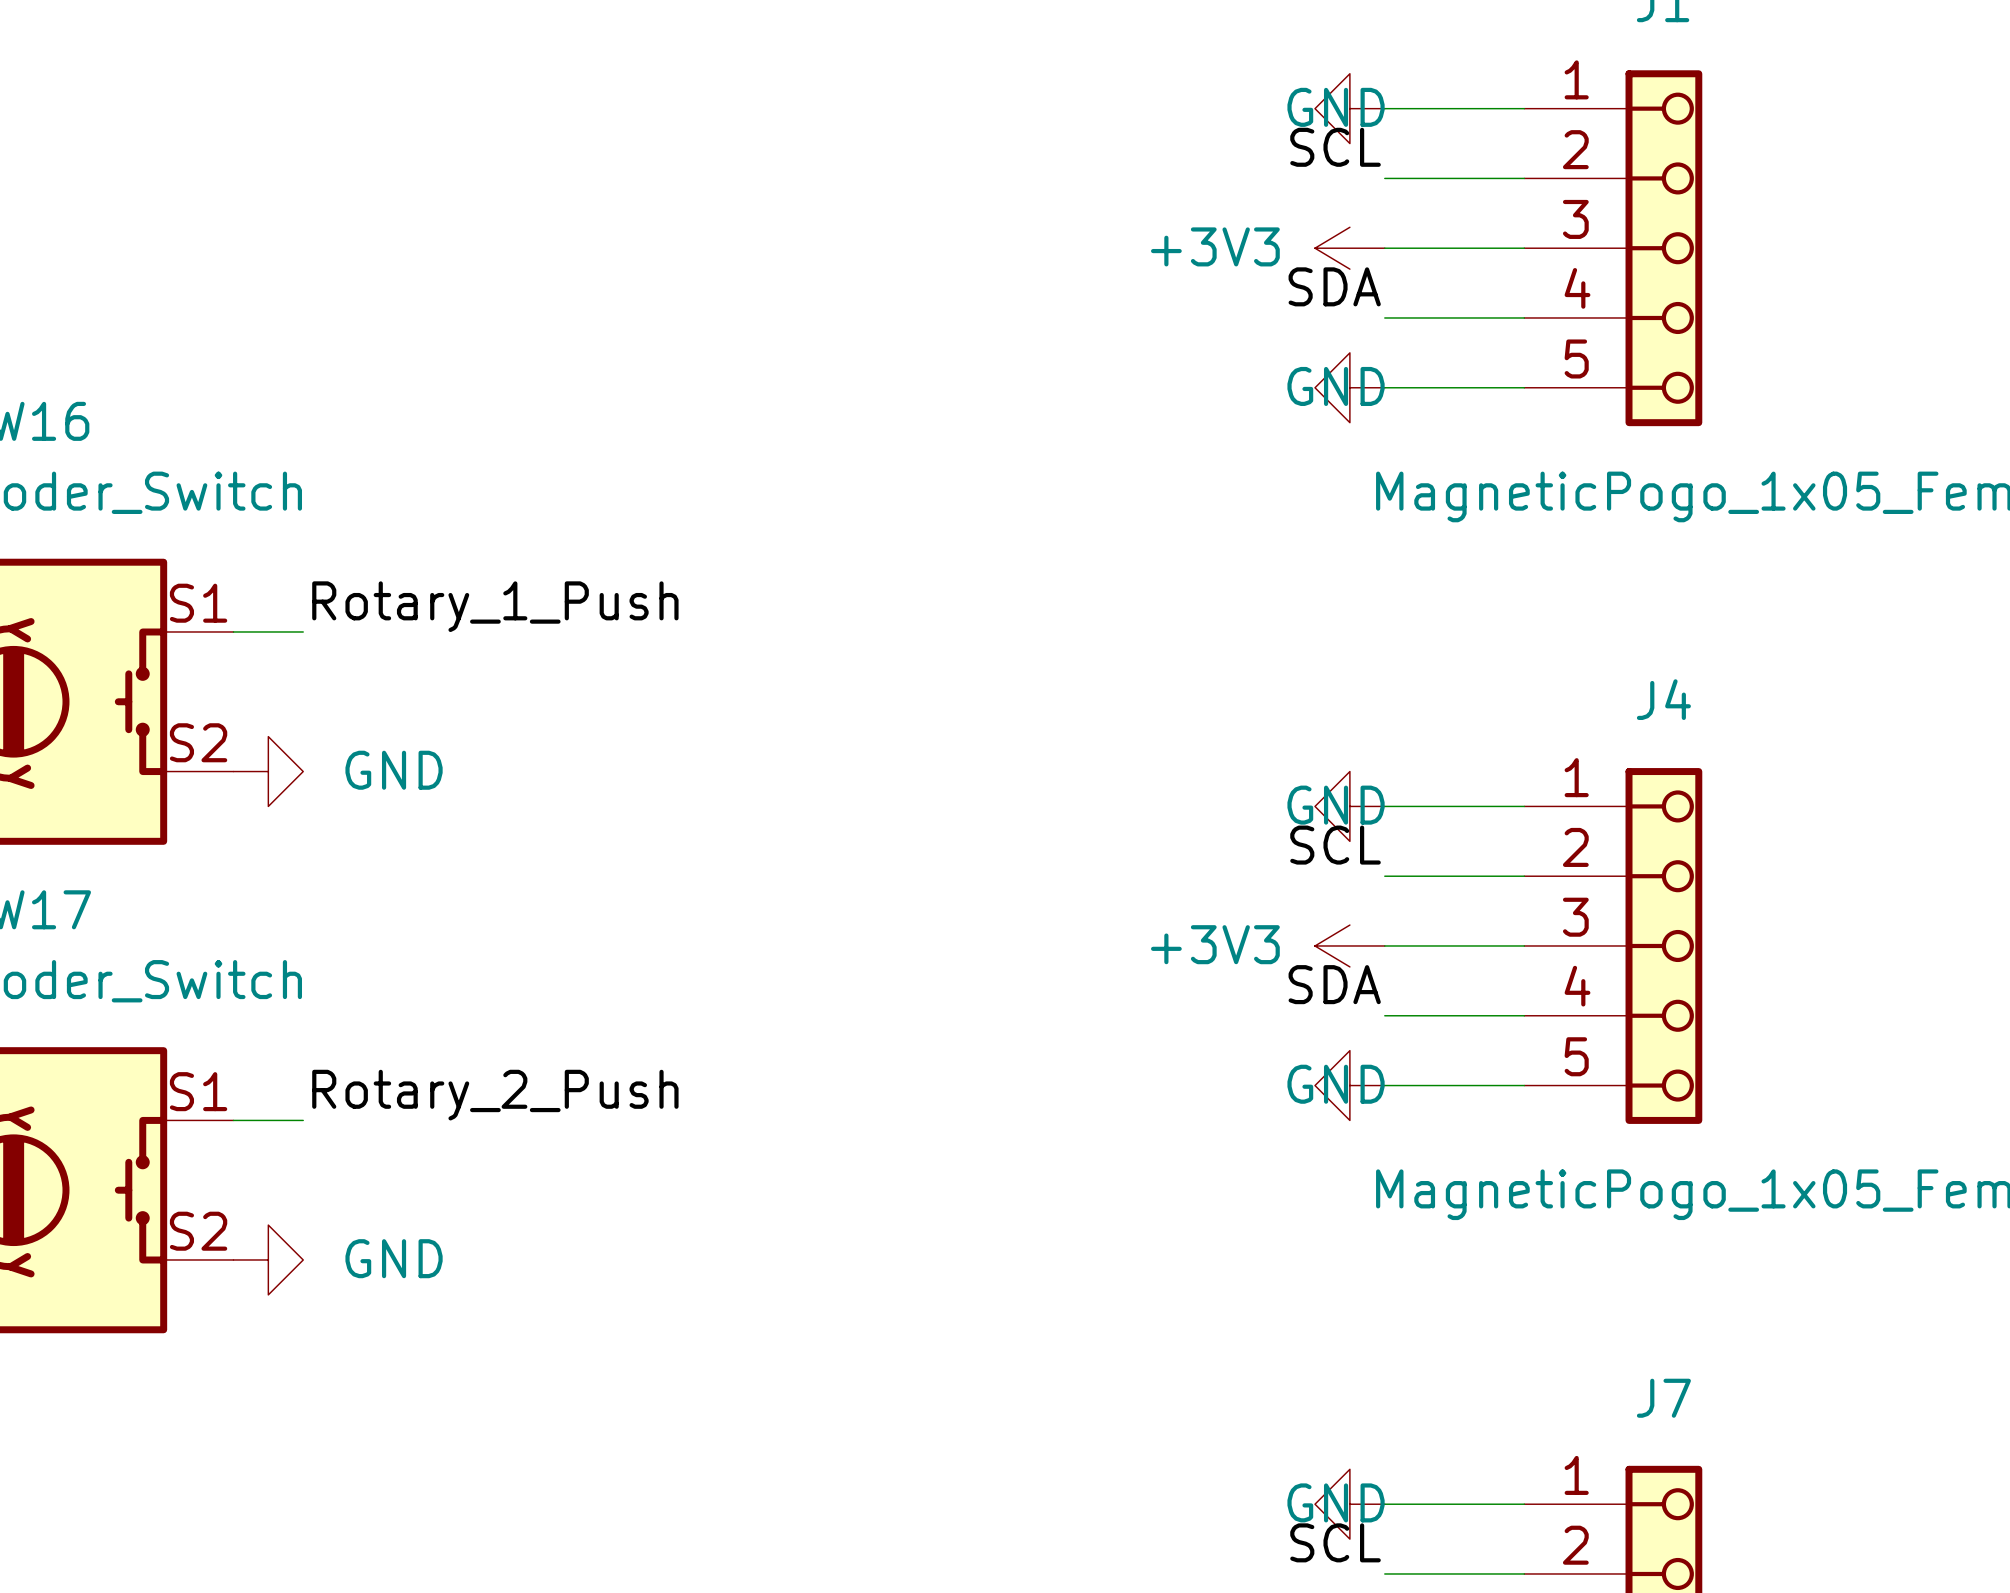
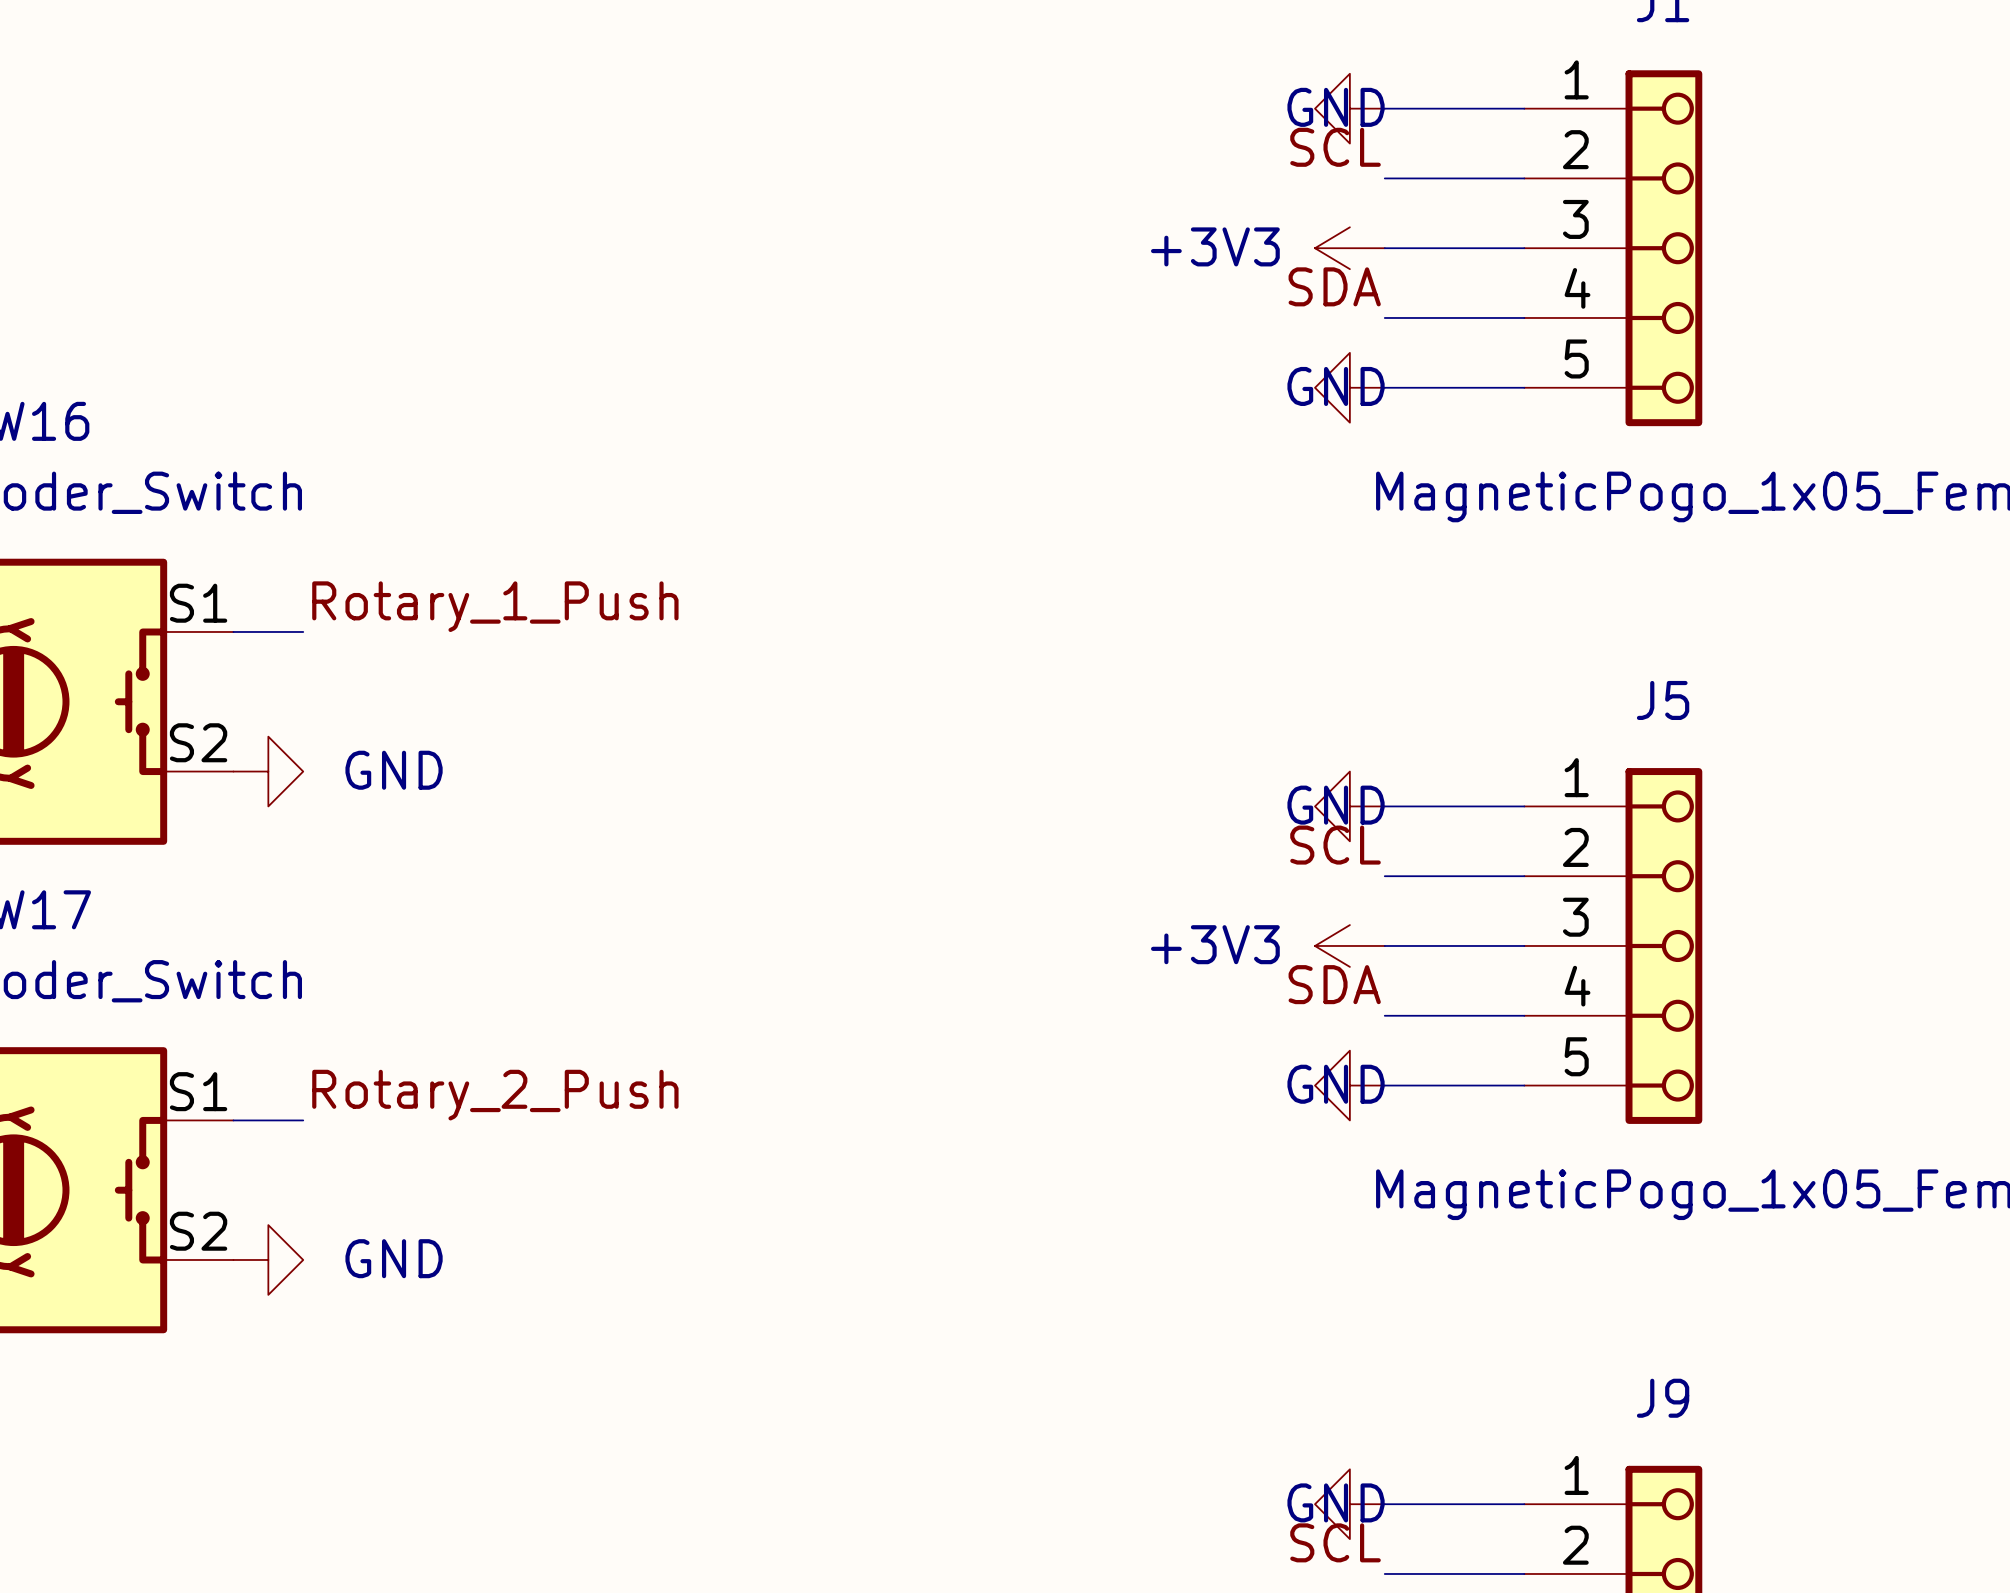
J4 name: J4 (1663, 699) -> J5 (1663, 700)
J7 name: J7 (1663, 1398) -> J9 (1663, 1398)

